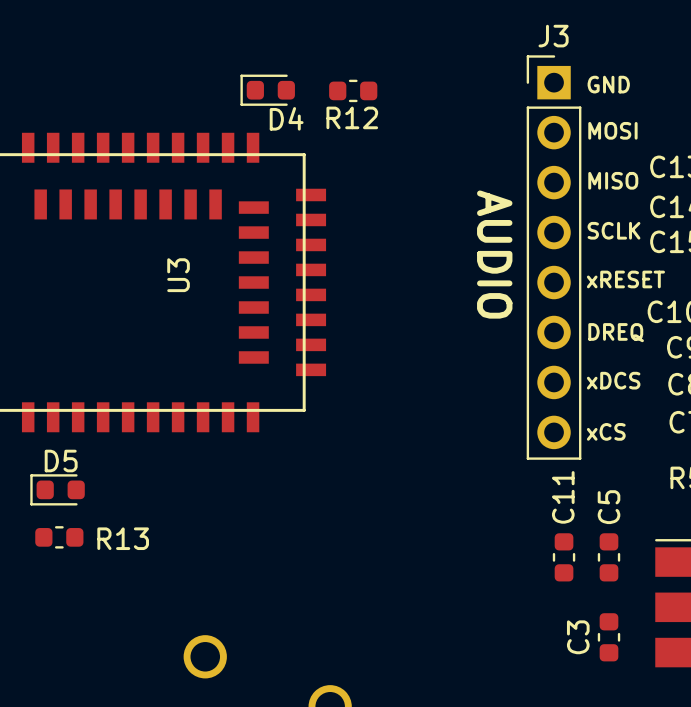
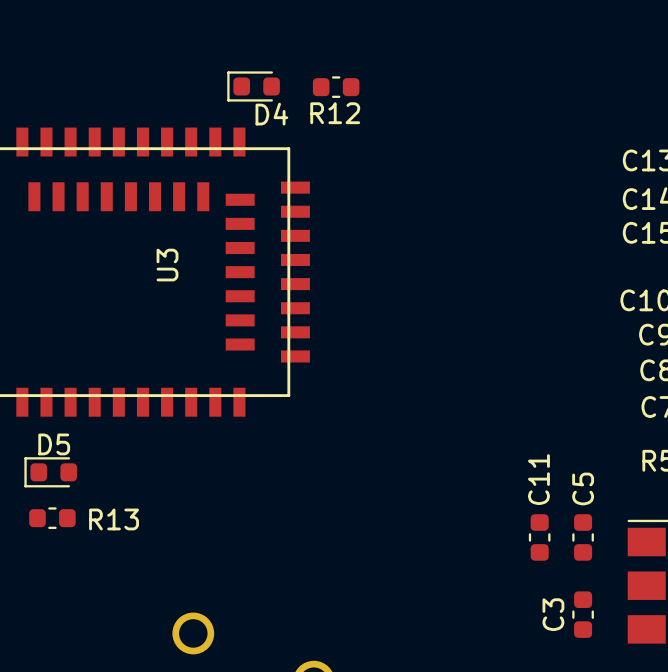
text: GND (608, 84) -> none
text: MOSI (612, 130) -> none
text: MISO (613, 180) -> none
text: SCLK (613, 230) -> none
text: AUDIO (494, 254) -> none
J3: (554, 257) -> none
text: xRESET (625, 279) -> none
text: DREQ (616, 332) -> none
text: xDCS (613, 380) -> none
text: xCS (606, 431) -> none

